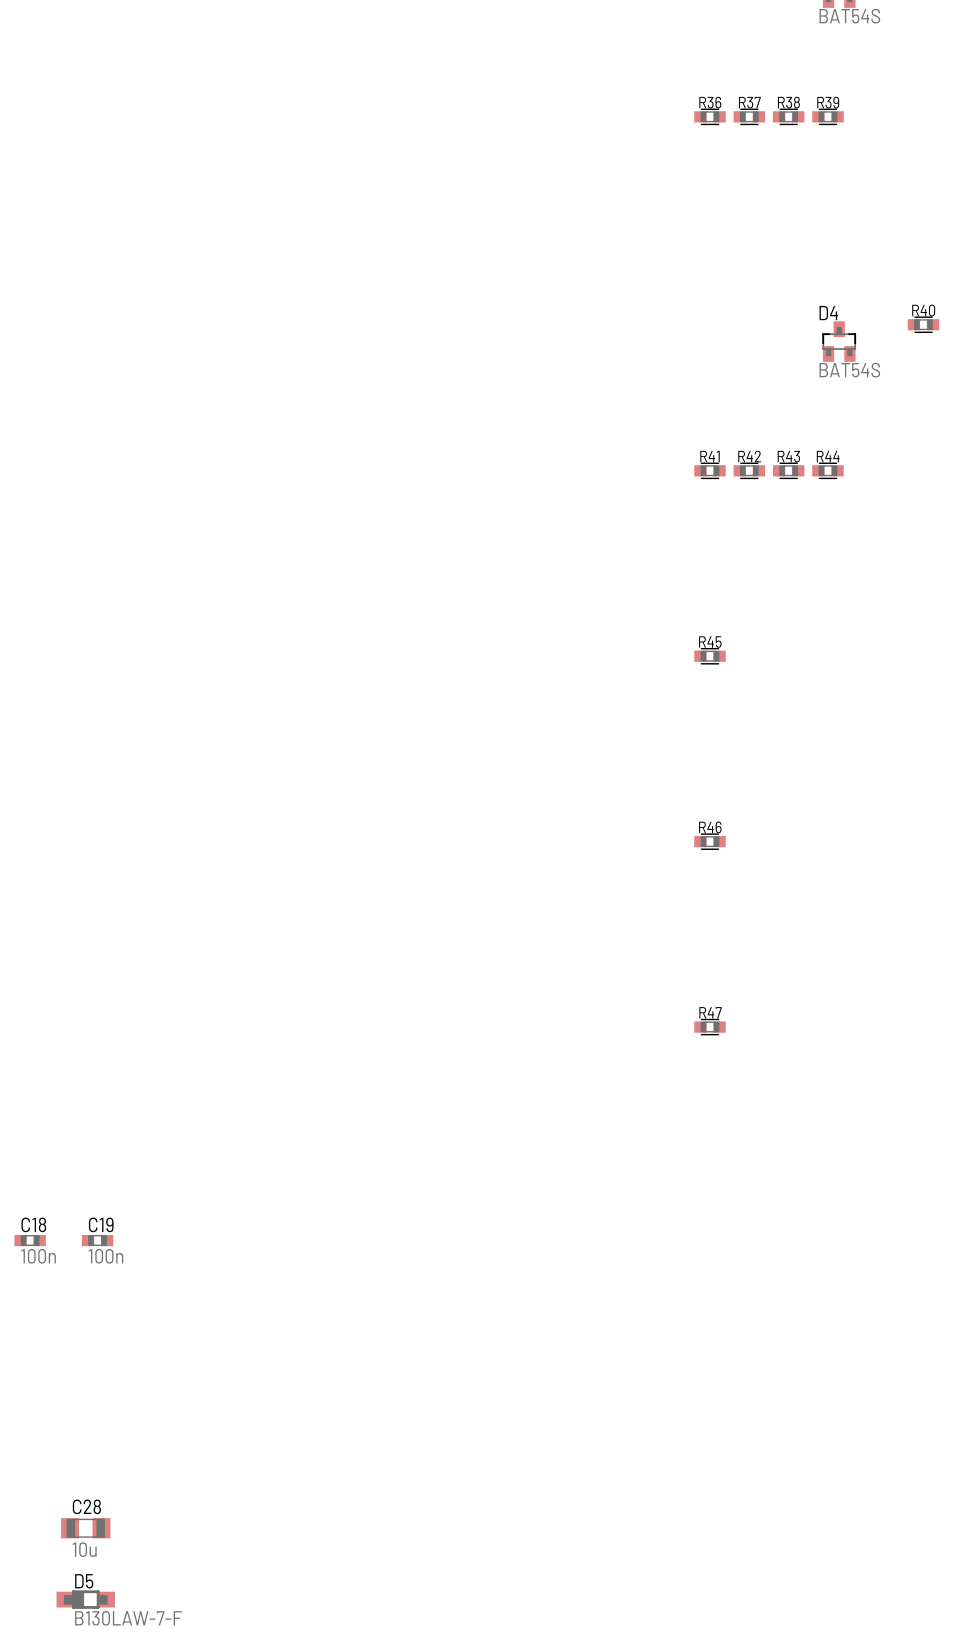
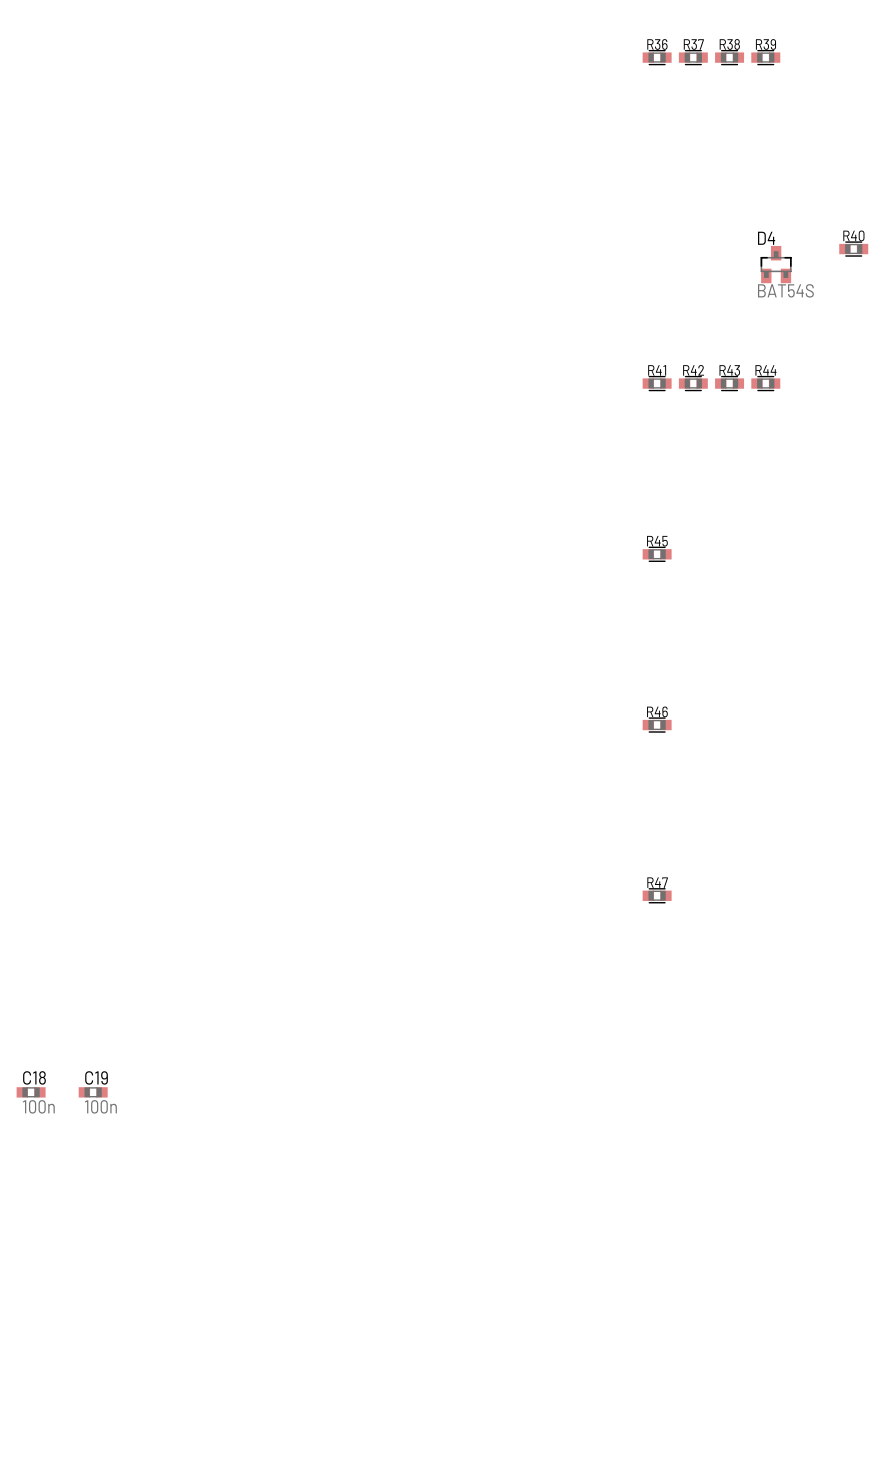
C28: 10u (85, 1528) -> none
D5: B130LAW-7-F (85, 1599) -> none

